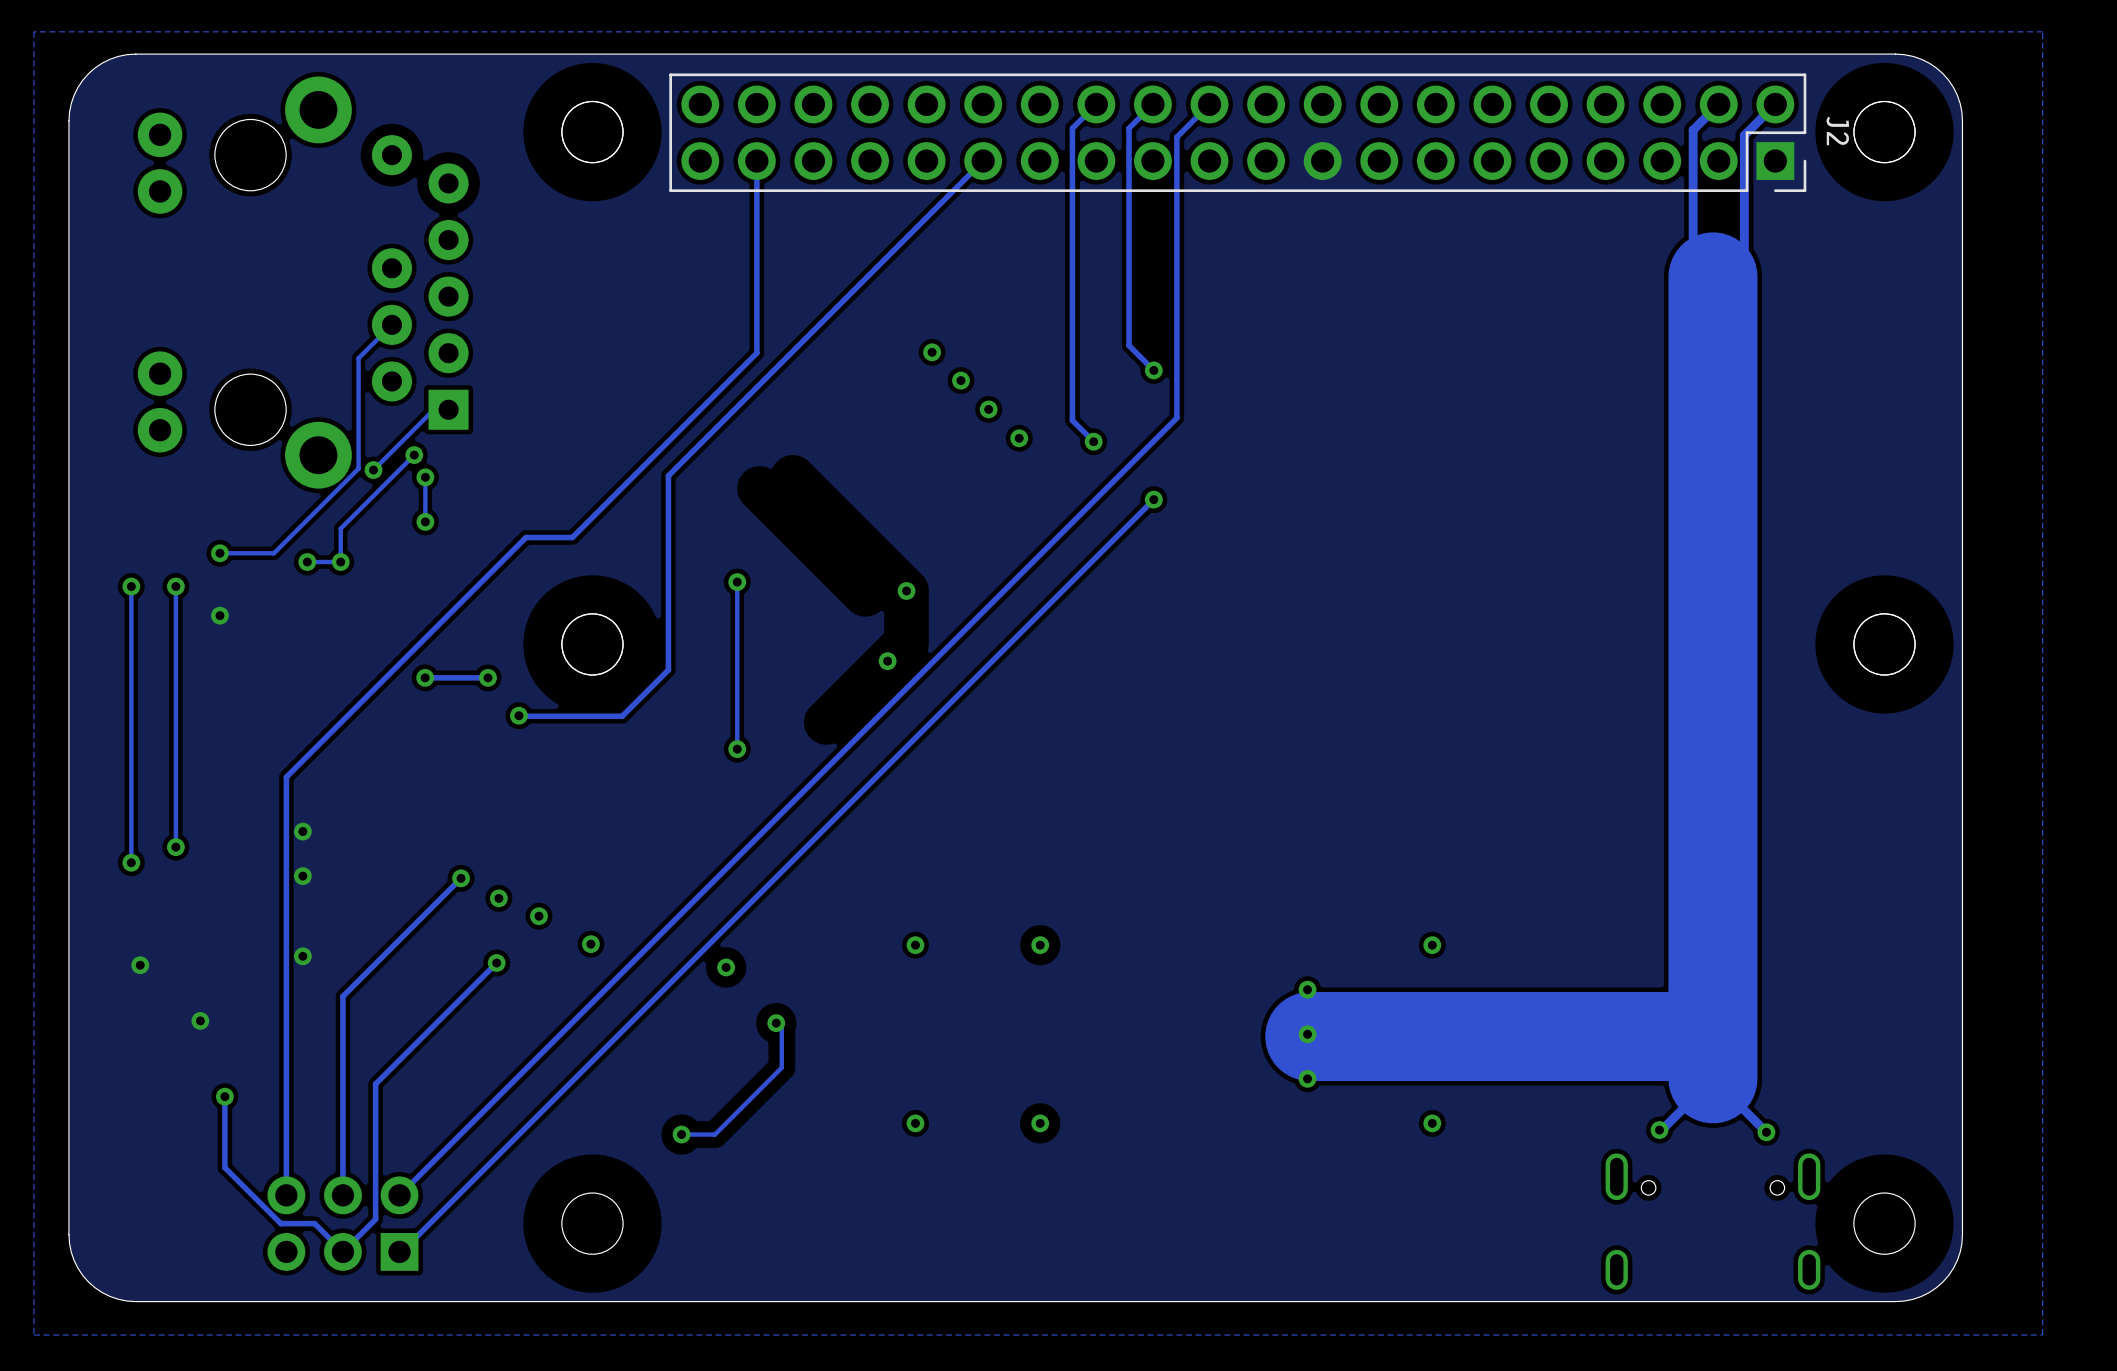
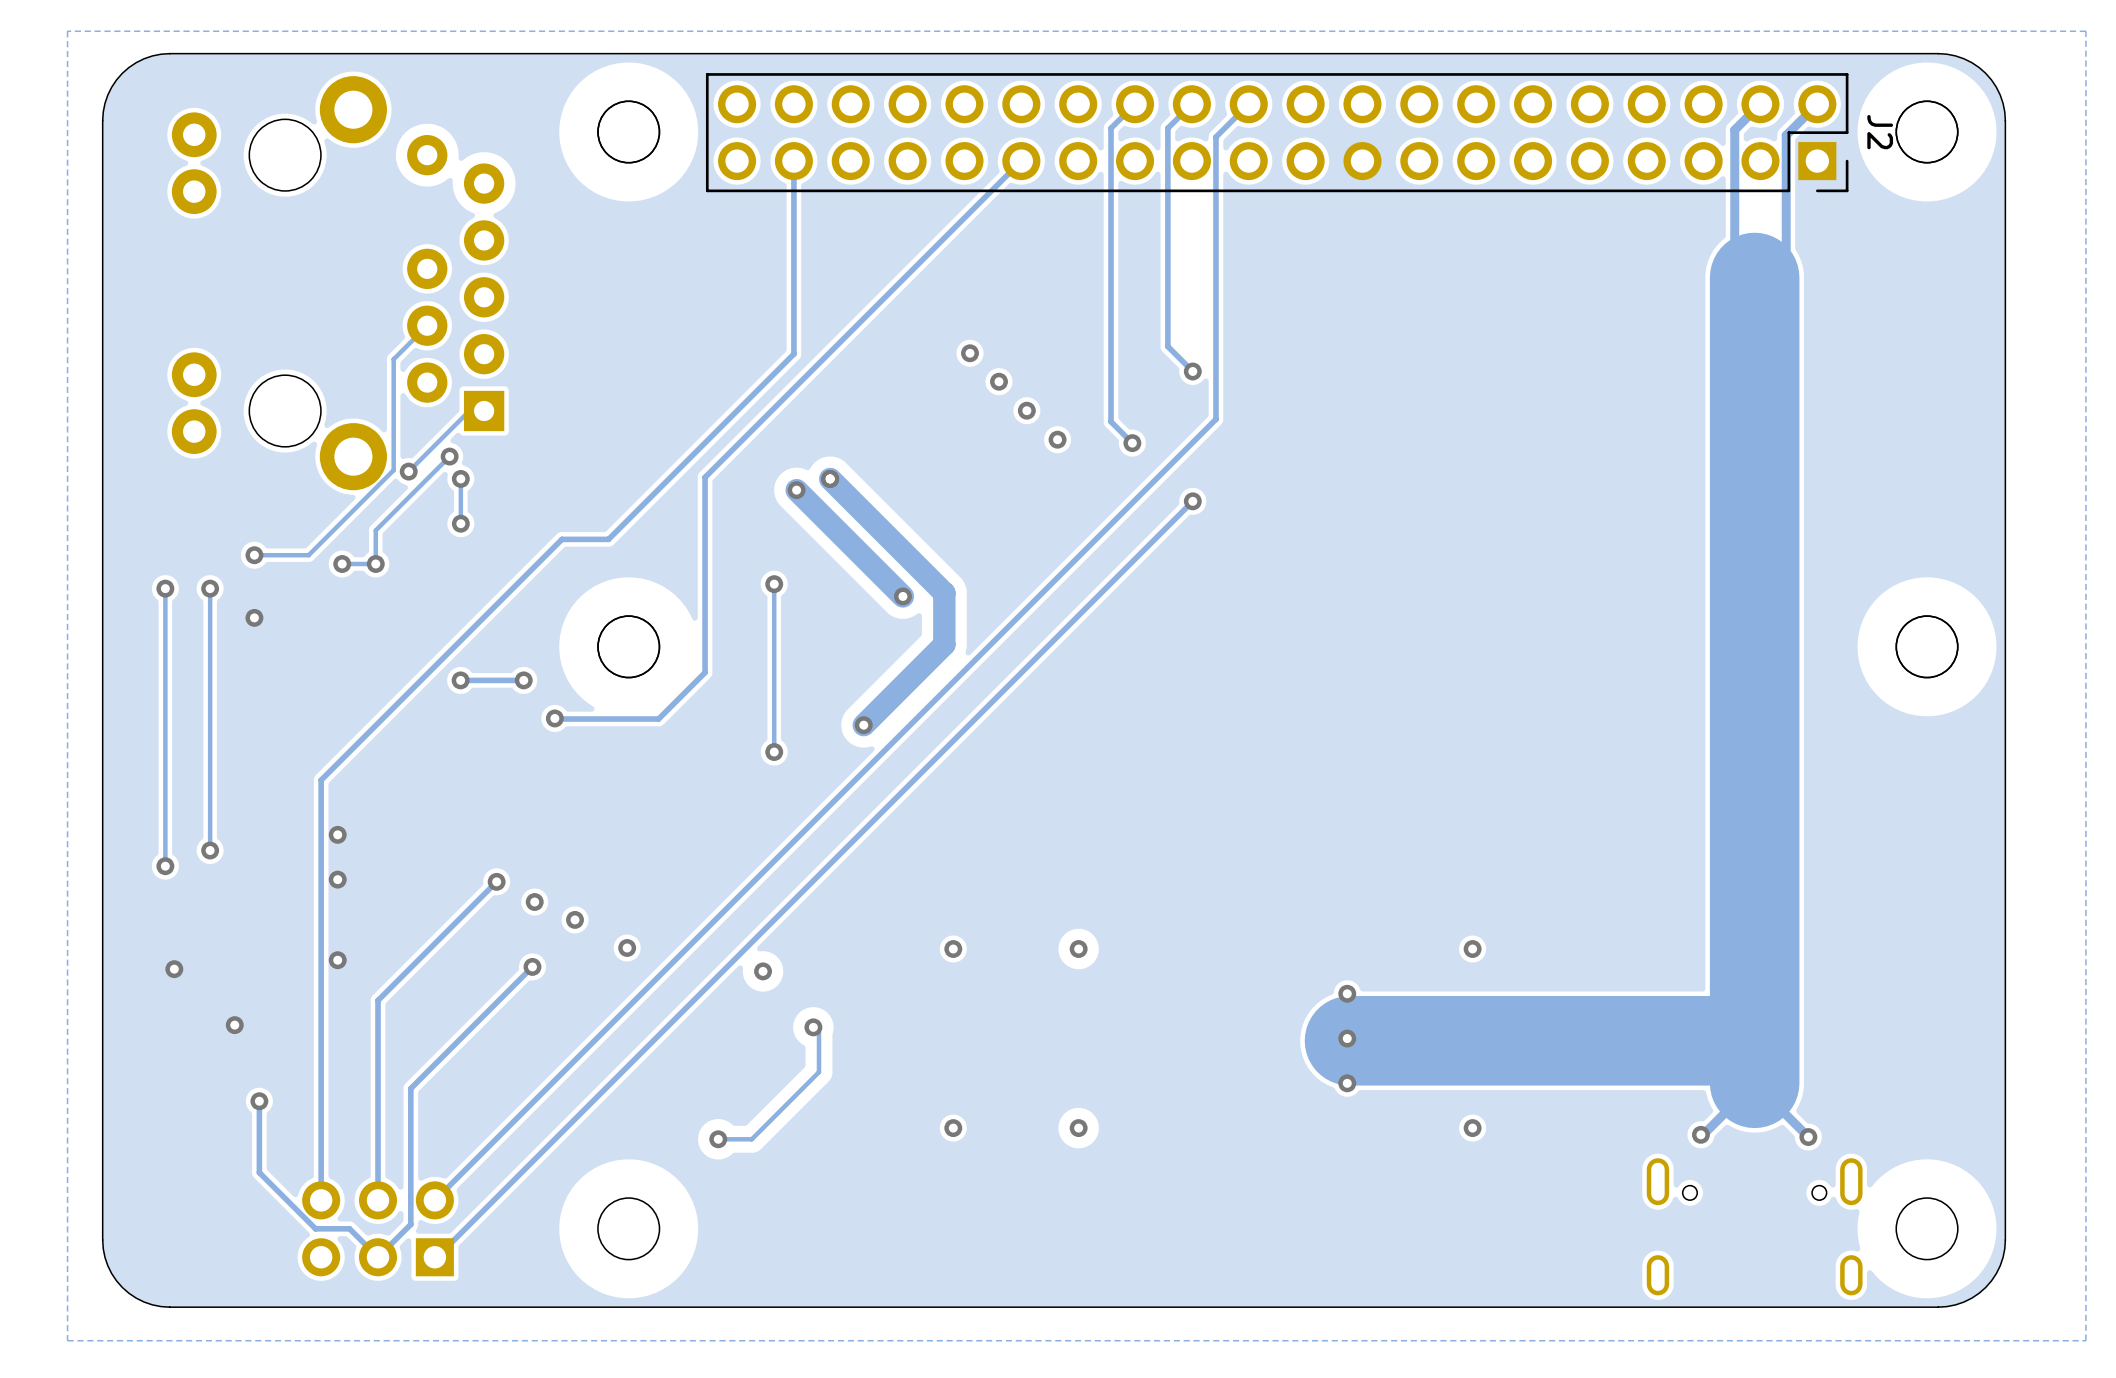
track: none -> (830, 478) (944, 593) (944, 644) (863, 725)
via: none -> (830, 478)
track: none -> (796, 490) (902, 596)
via: none -> (796, 490)
via: (906, 590) -> none
via: none -> (902, 596)
via: (887, 661) -> none
via: none -> (863, 725)

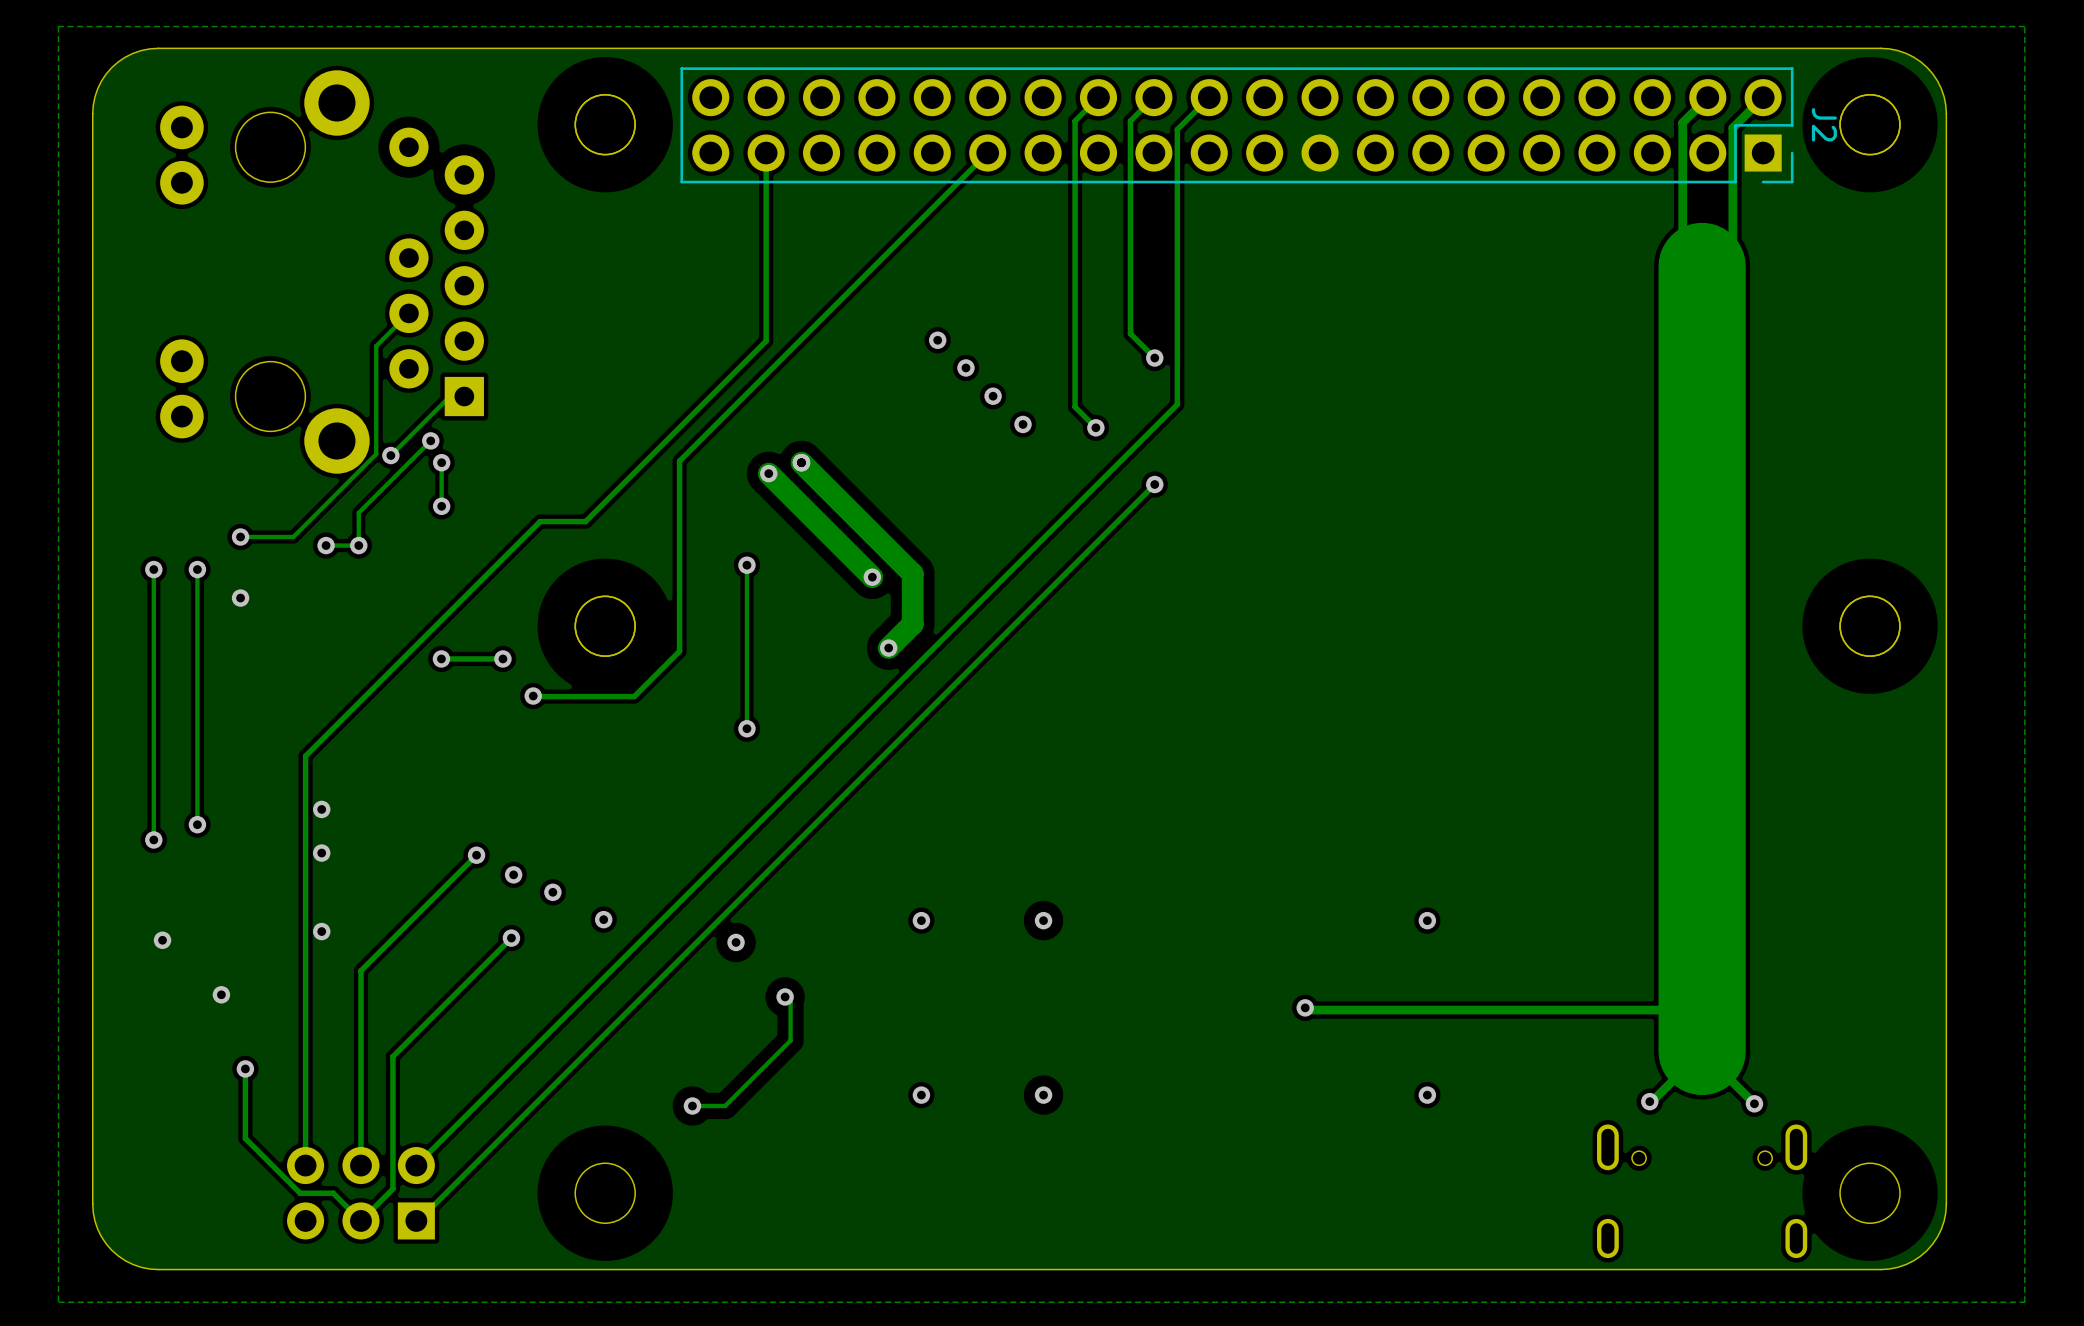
track: (919, 669) (863, 725) -> none
via position: (863, 725) -> (888, 648)
via: (1347, 993) -> none
track width: thick (1347, 1038) (1349, 1040) (1712, 1040) -> thin (1305, 1007) (1307, 1010) (1660, 1010)
via: (1347, 1083) -> none

